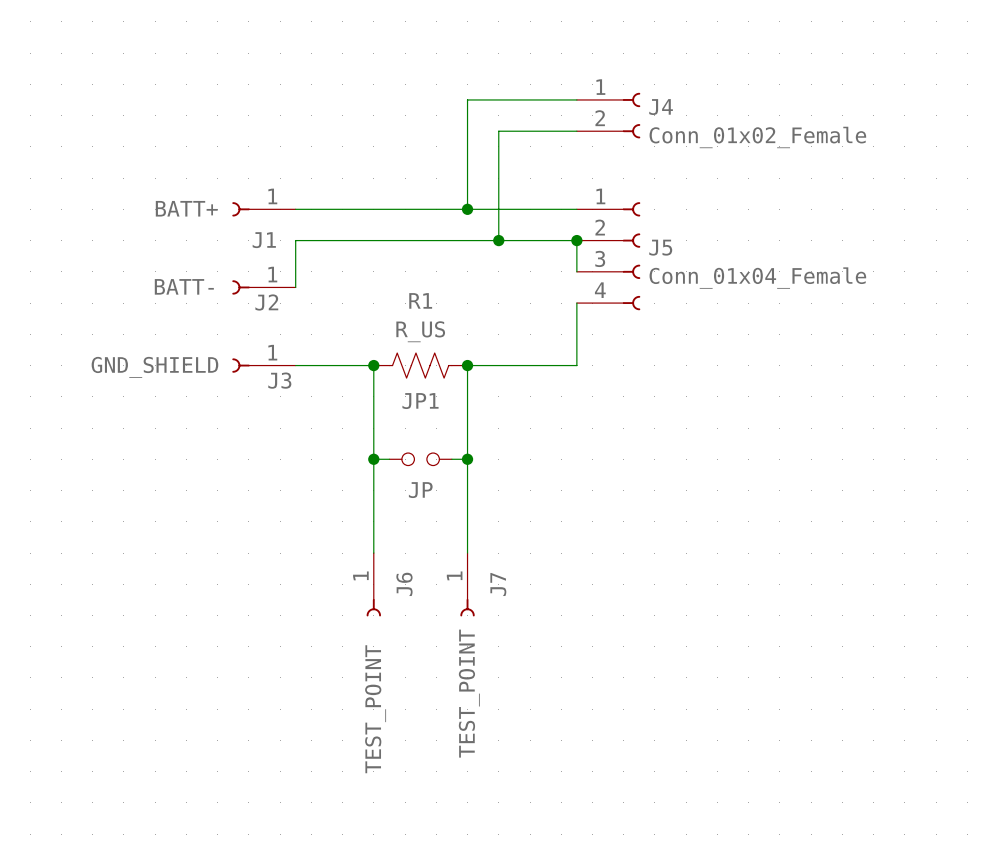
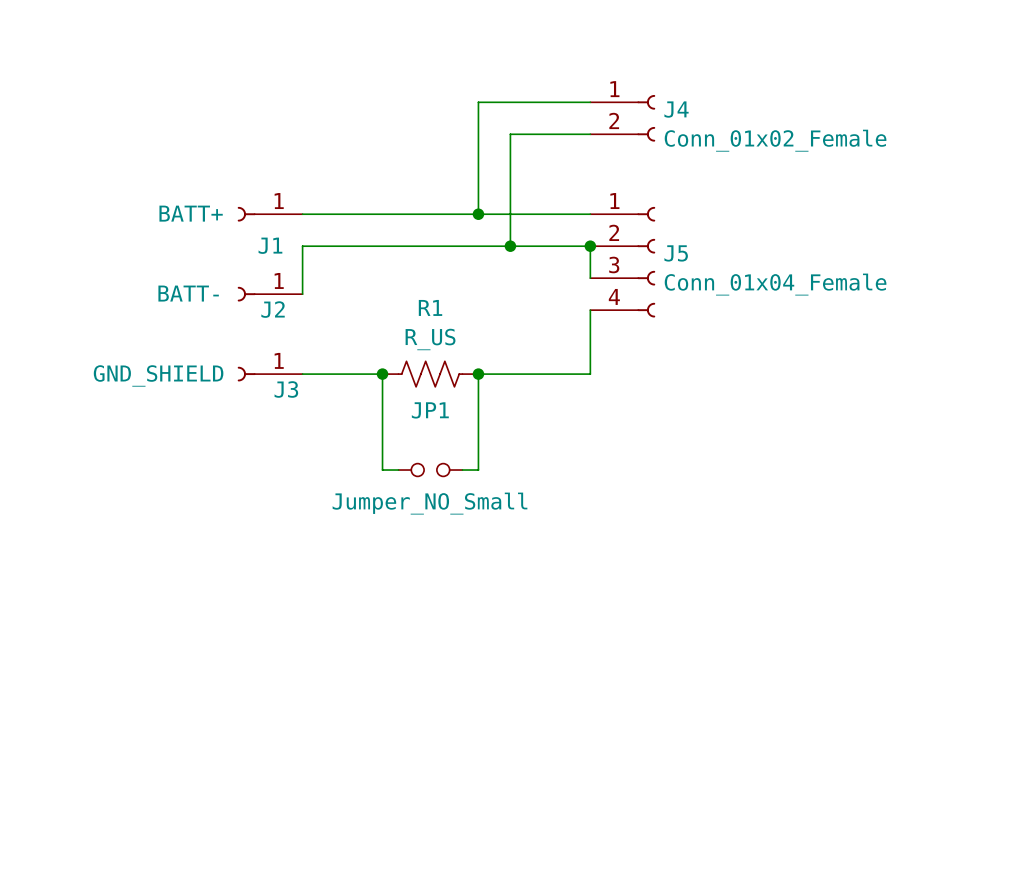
wire: (373, 459) (373, 553) -> none
junction: (373, 459) -> none
wire: (467, 459) (467, 553) -> none
junction: (467, 459) -> none
JP1 value: JP (420, 490) -> Jumper_NO_Small (430, 503)
J6: TEST_POINT (373, 584) -> none
J7: TEST_POINT (467, 584) -> none

